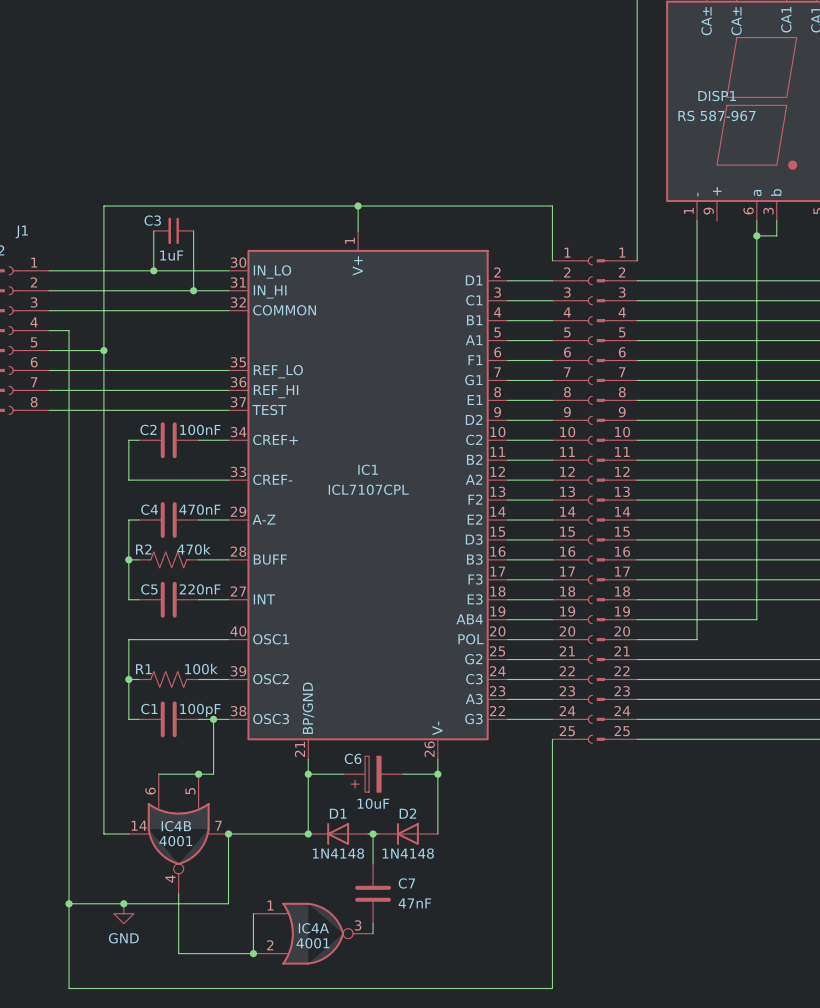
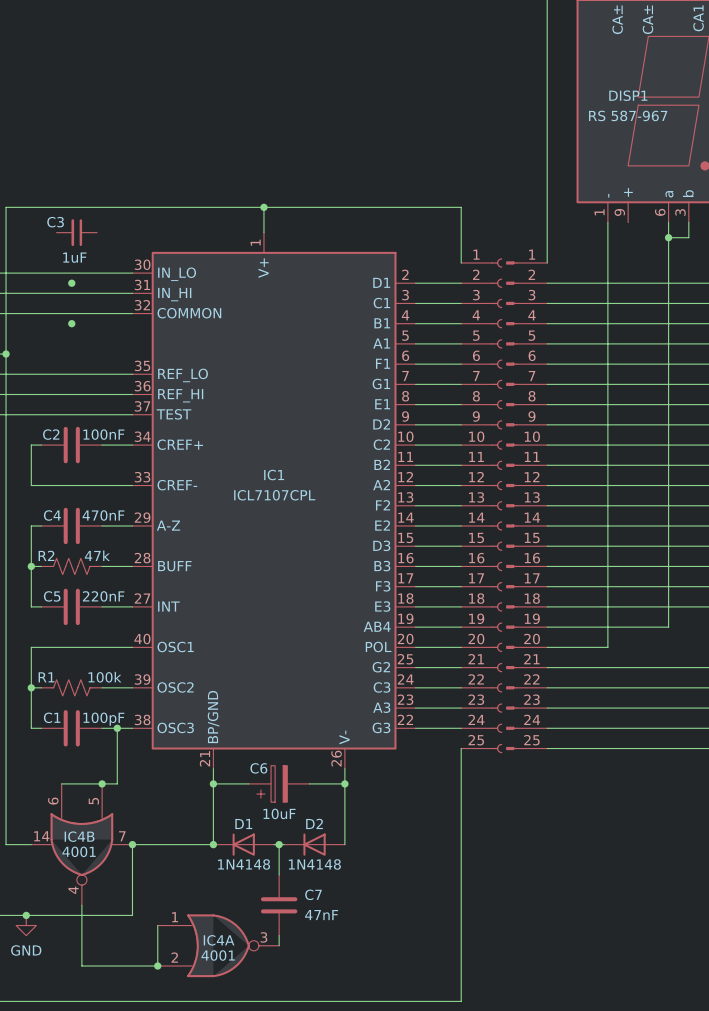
wire: (153, 230) (153, 270) -> none
wire: (193, 230) (193, 290) -> none
junction: (153, 270) -> none
junction: none -> (71, 283)
junction: (193, 290) -> none
junction: none -> (71, 323)
R2 value: 470k (193, 549) -> 47k (97, 555)

